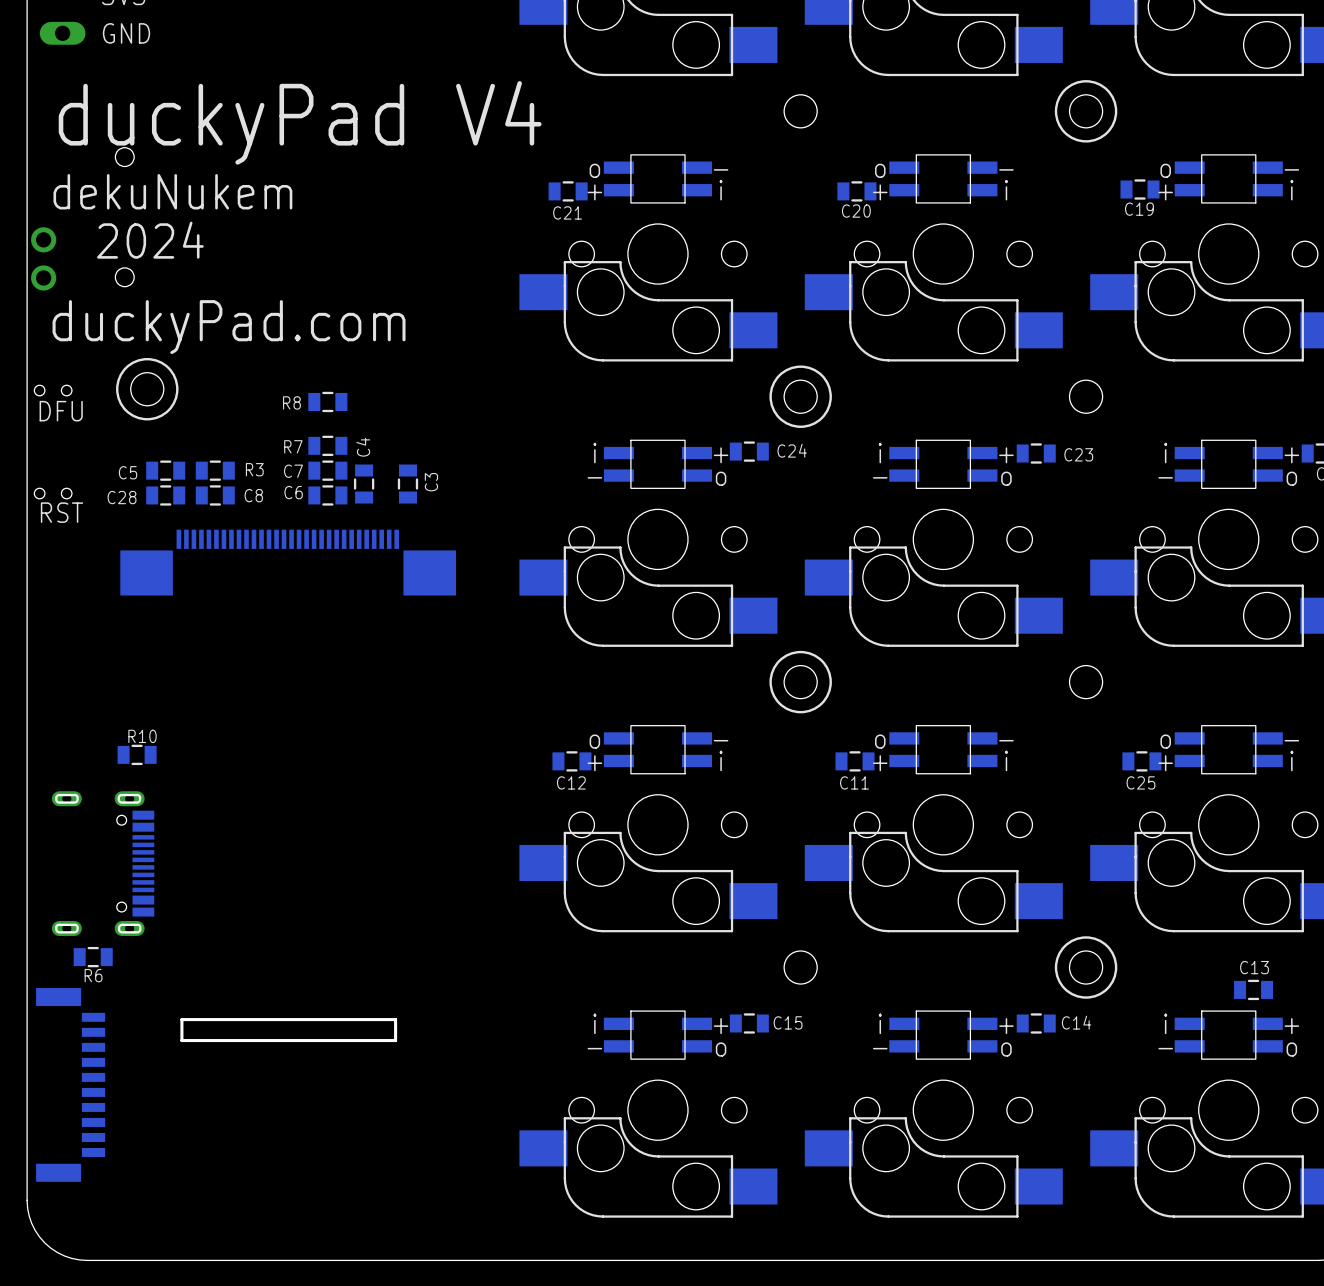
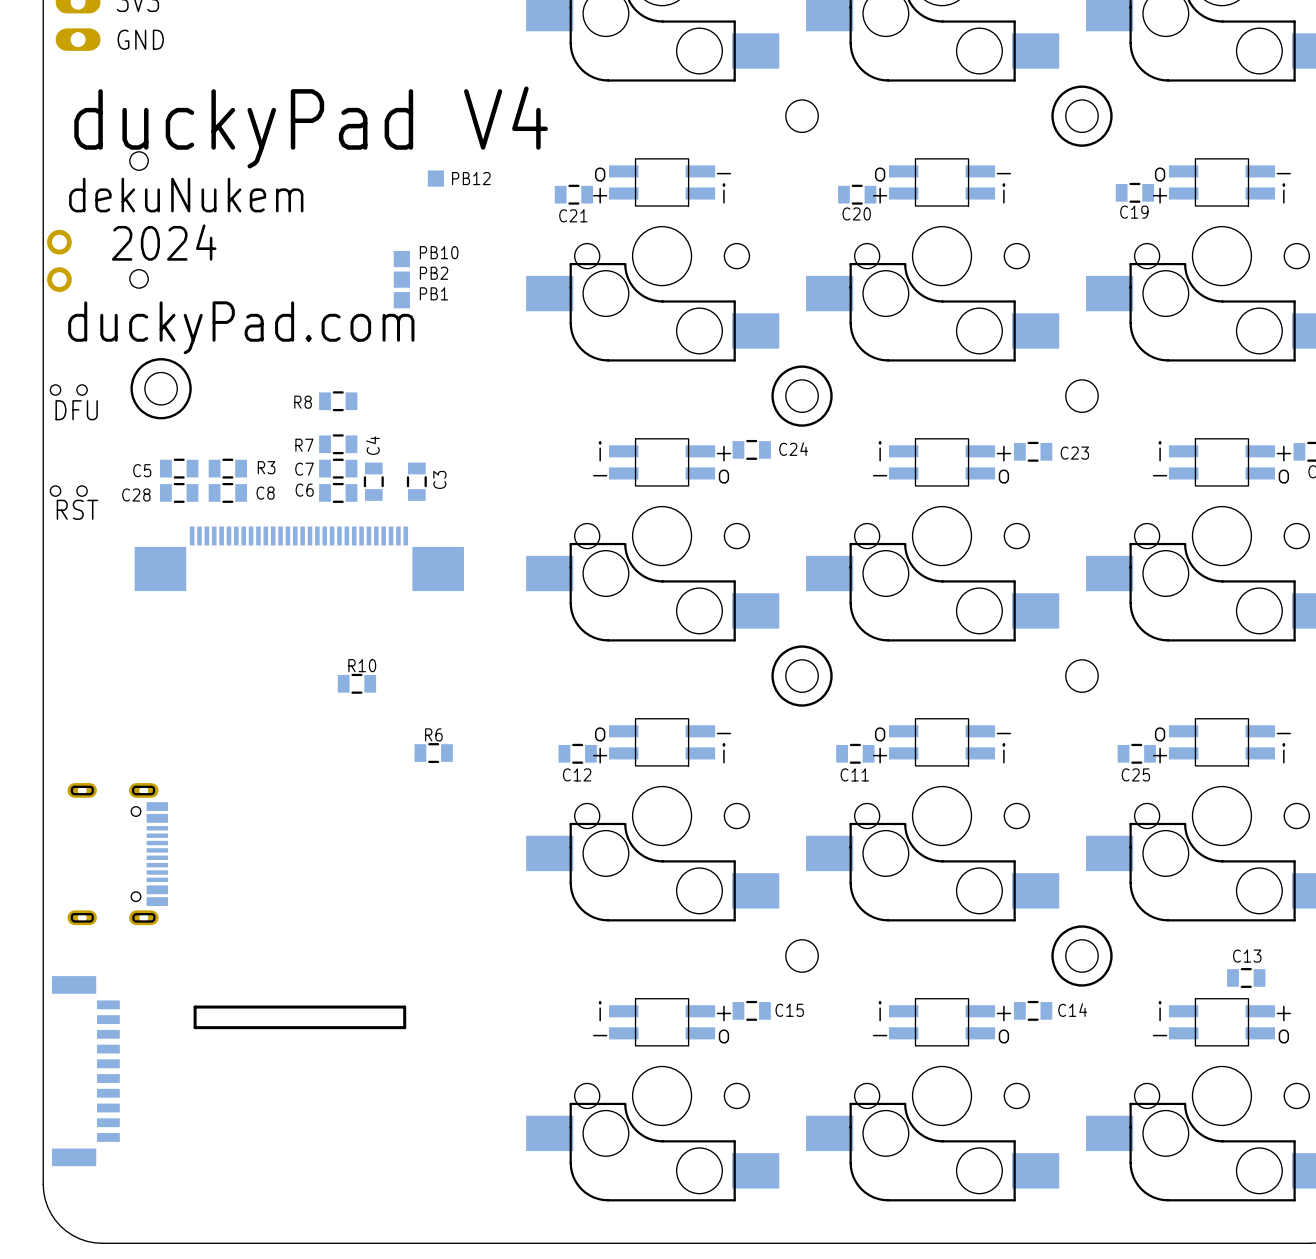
part: none -> (435, 178)
text: none -> PB12 (471, 178)
text: none -> PB10 (439, 252)
part: none -> (401, 259)
text: none -> PB2 (434, 273)
part: none -> (401, 279)
text: none -> PB1 (434, 293)
part: none -> (401, 300)
R10 position: (137, 754) -> (356, 683)
R6 position: (93, 957) -> (433, 753)
R6 name position: R6 (93, 975) -> R6 (433, 734)

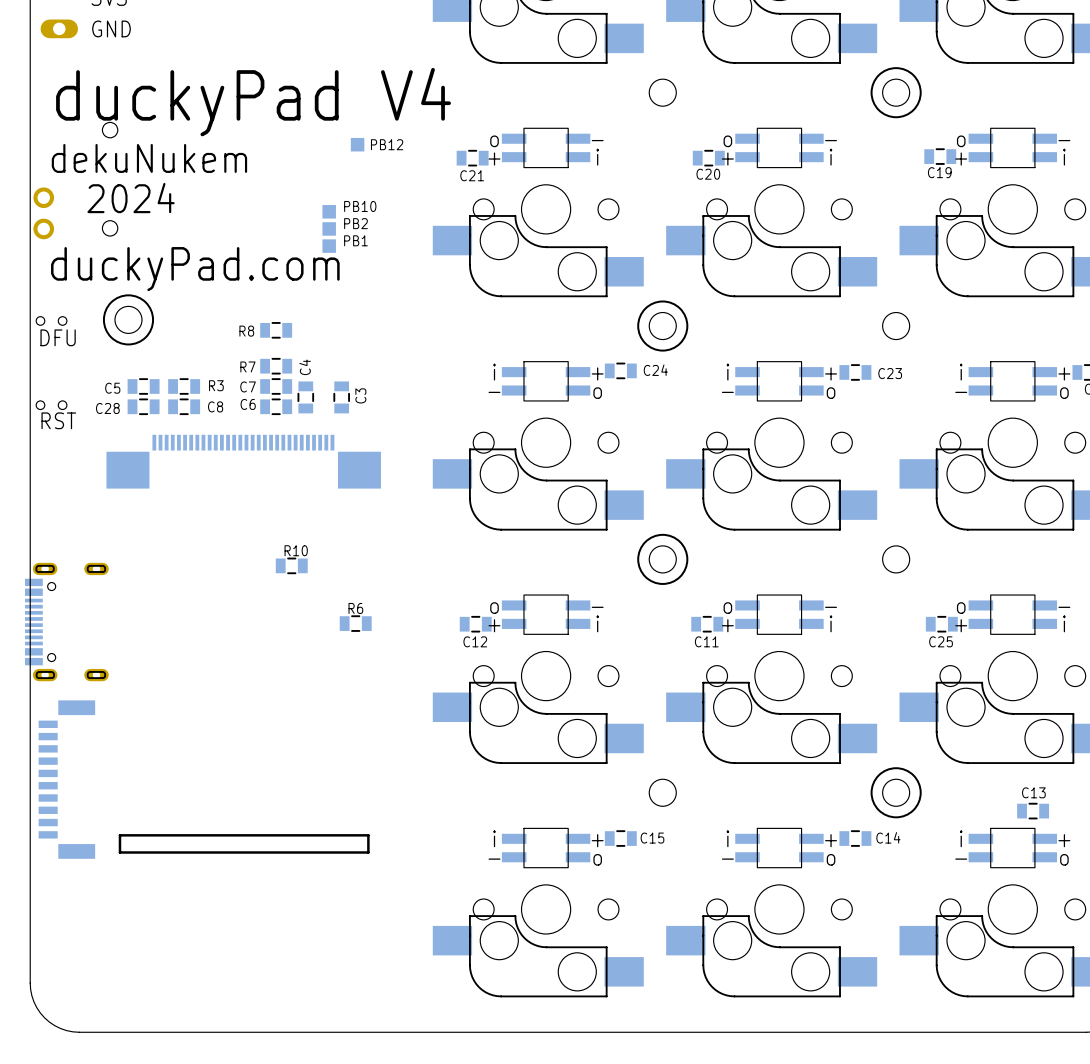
part rotation: 0° (117, 854) -> 180° (66, 622)
part position: (117, 854) -> (66, 622)
board edge: (195, 1007) (195, 1027) -> (156, 835) (119, 835) (119, 852) (156, 852)
board edge: (404, 1007) (404, 1027) -> (331, 835) (368, 835) (368, 852) (331, 852)
part rotation: 0° (85, 1071) -> 180° (66, 779)
part position: (85, 1071) -> (66, 779)

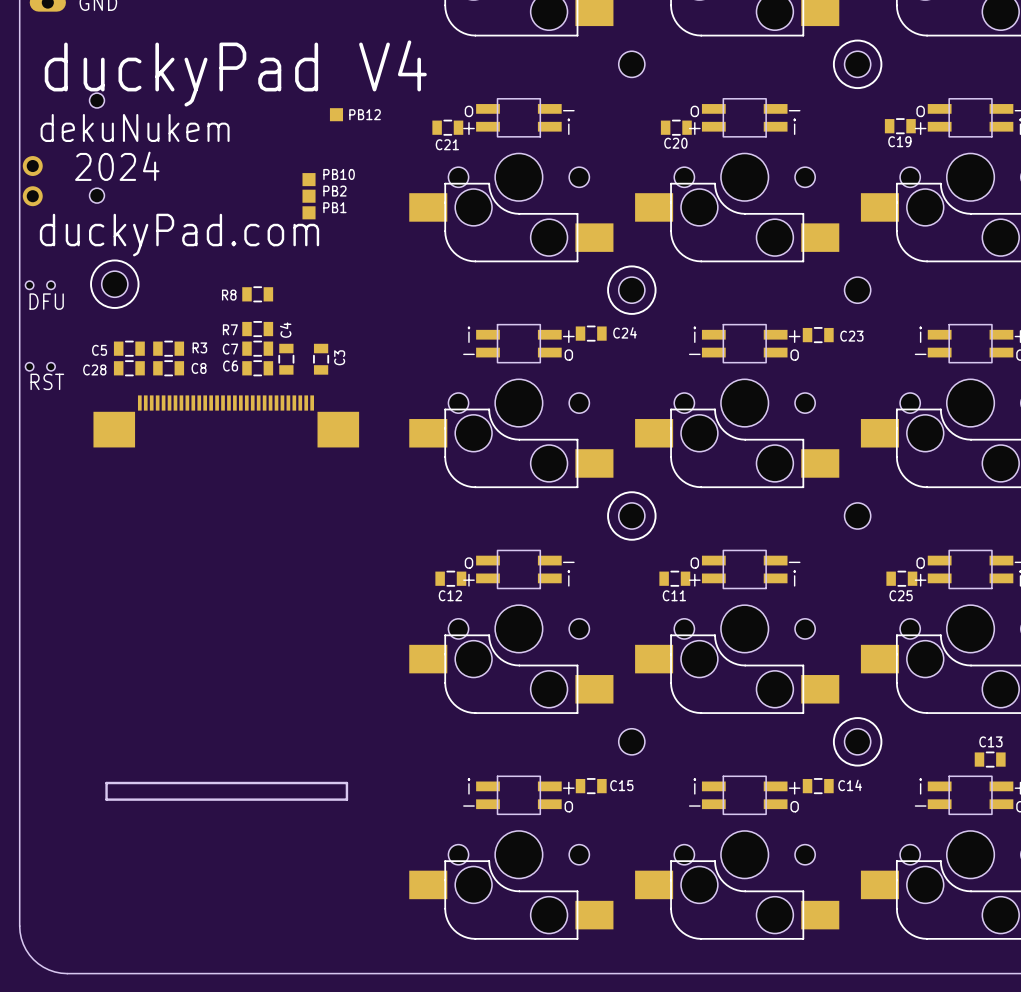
R10: (291, 565) -> none
part: (66, 622) -> none
R6: (355, 623) -> none
part: (66, 779) -> none

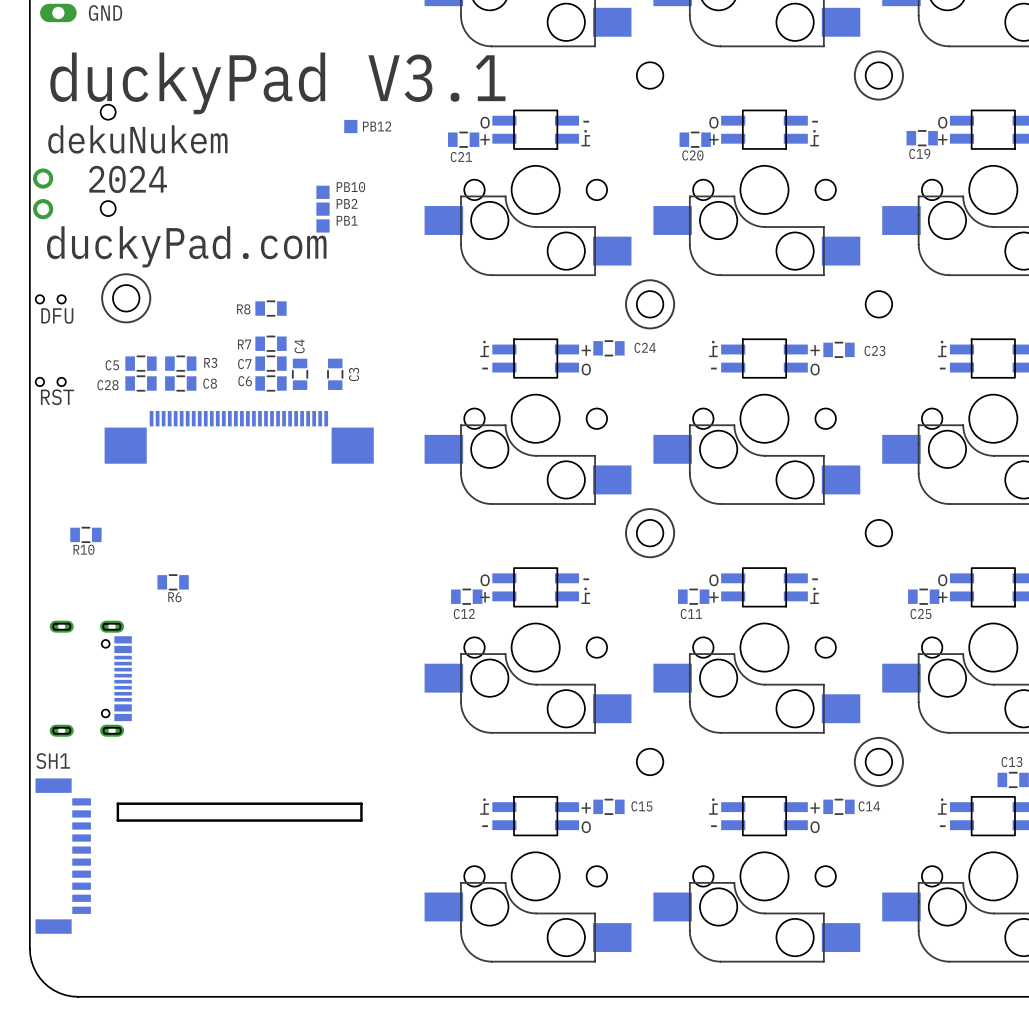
text: duckyPad V4 (235, 73) -> duckyPad V3.1 (277, 83)
R10: none -> (85, 534)
R6: none -> (173, 582)
part: none -> (90, 678)
SH1: none -> (63, 856)

